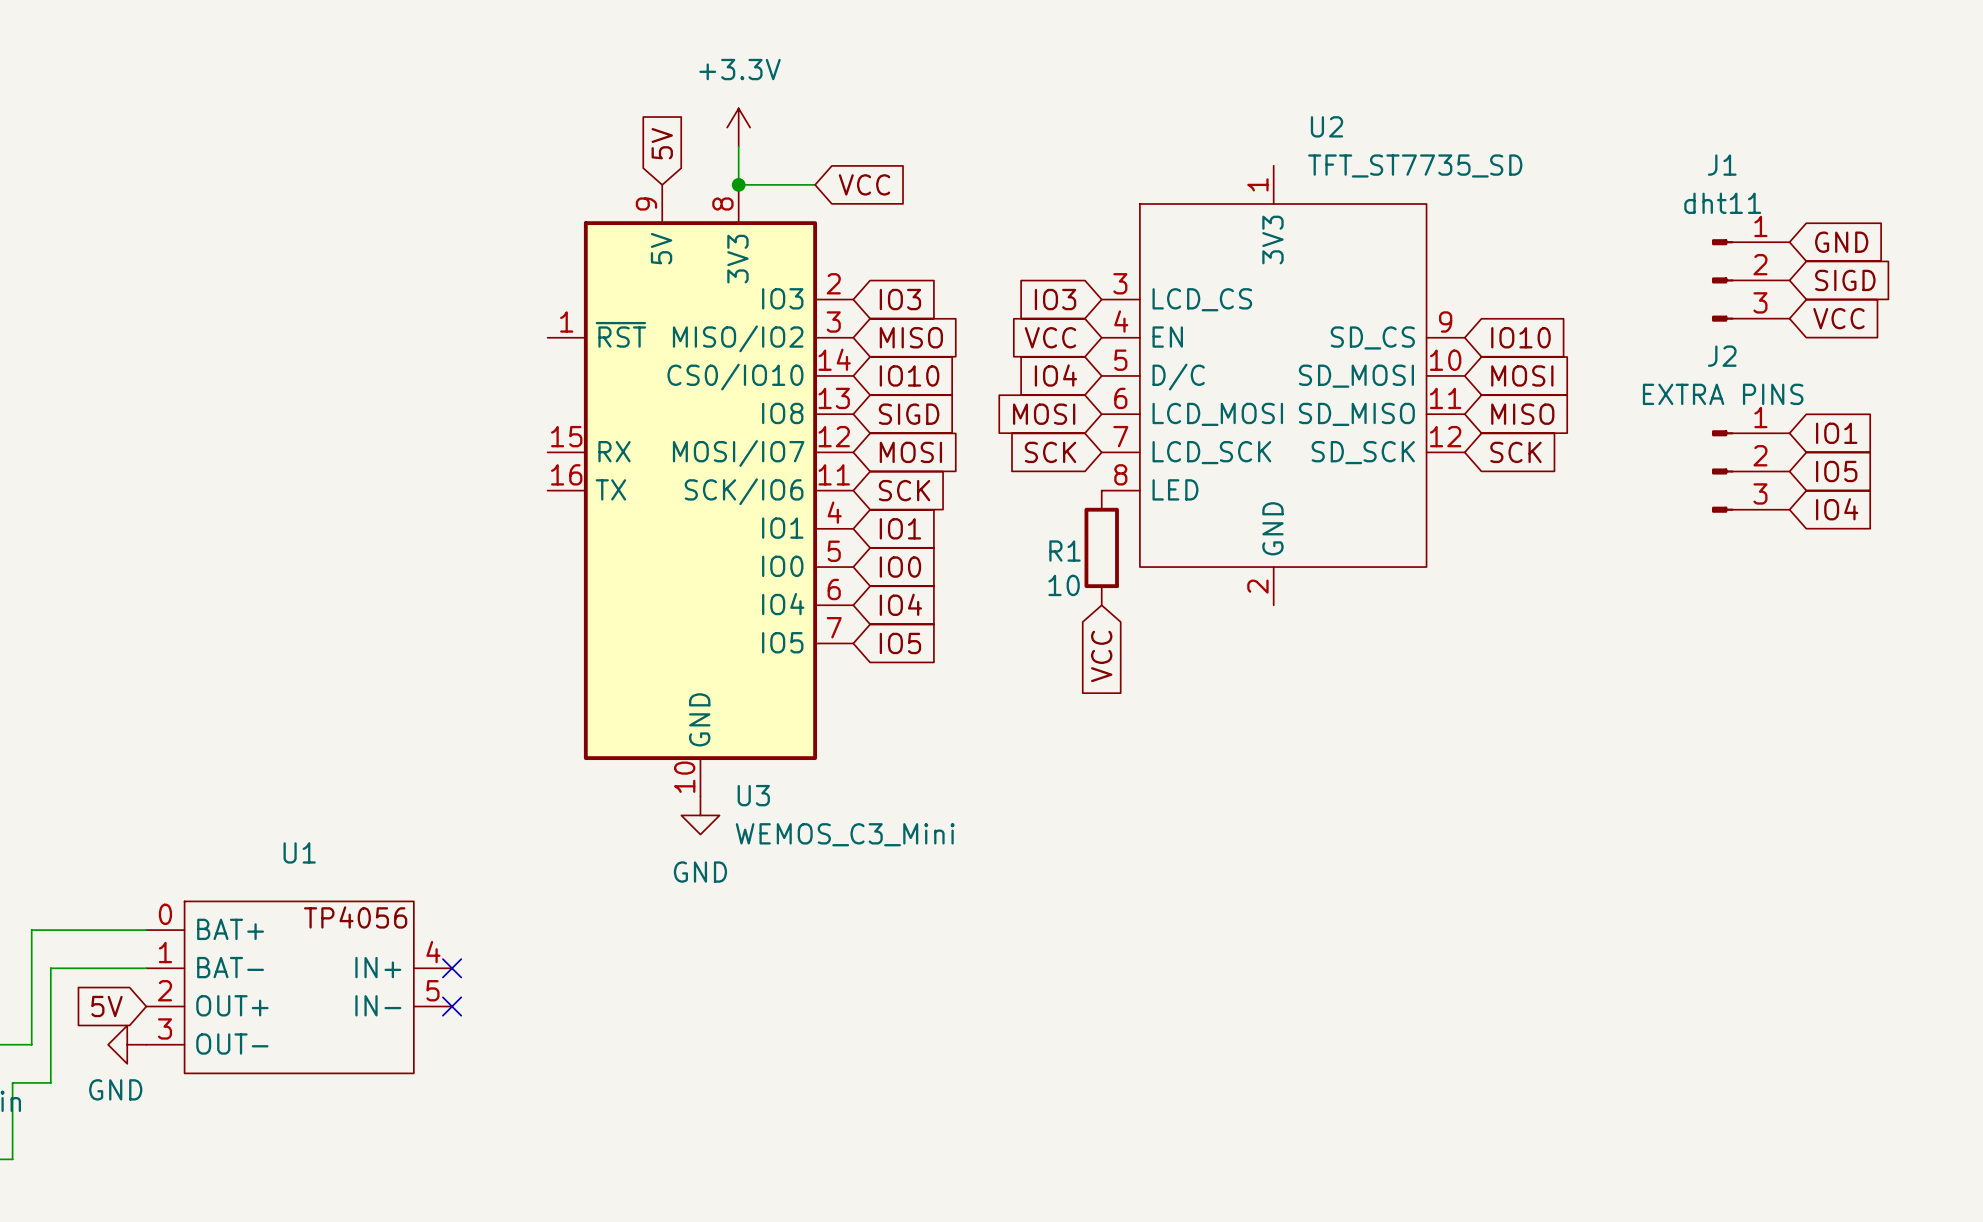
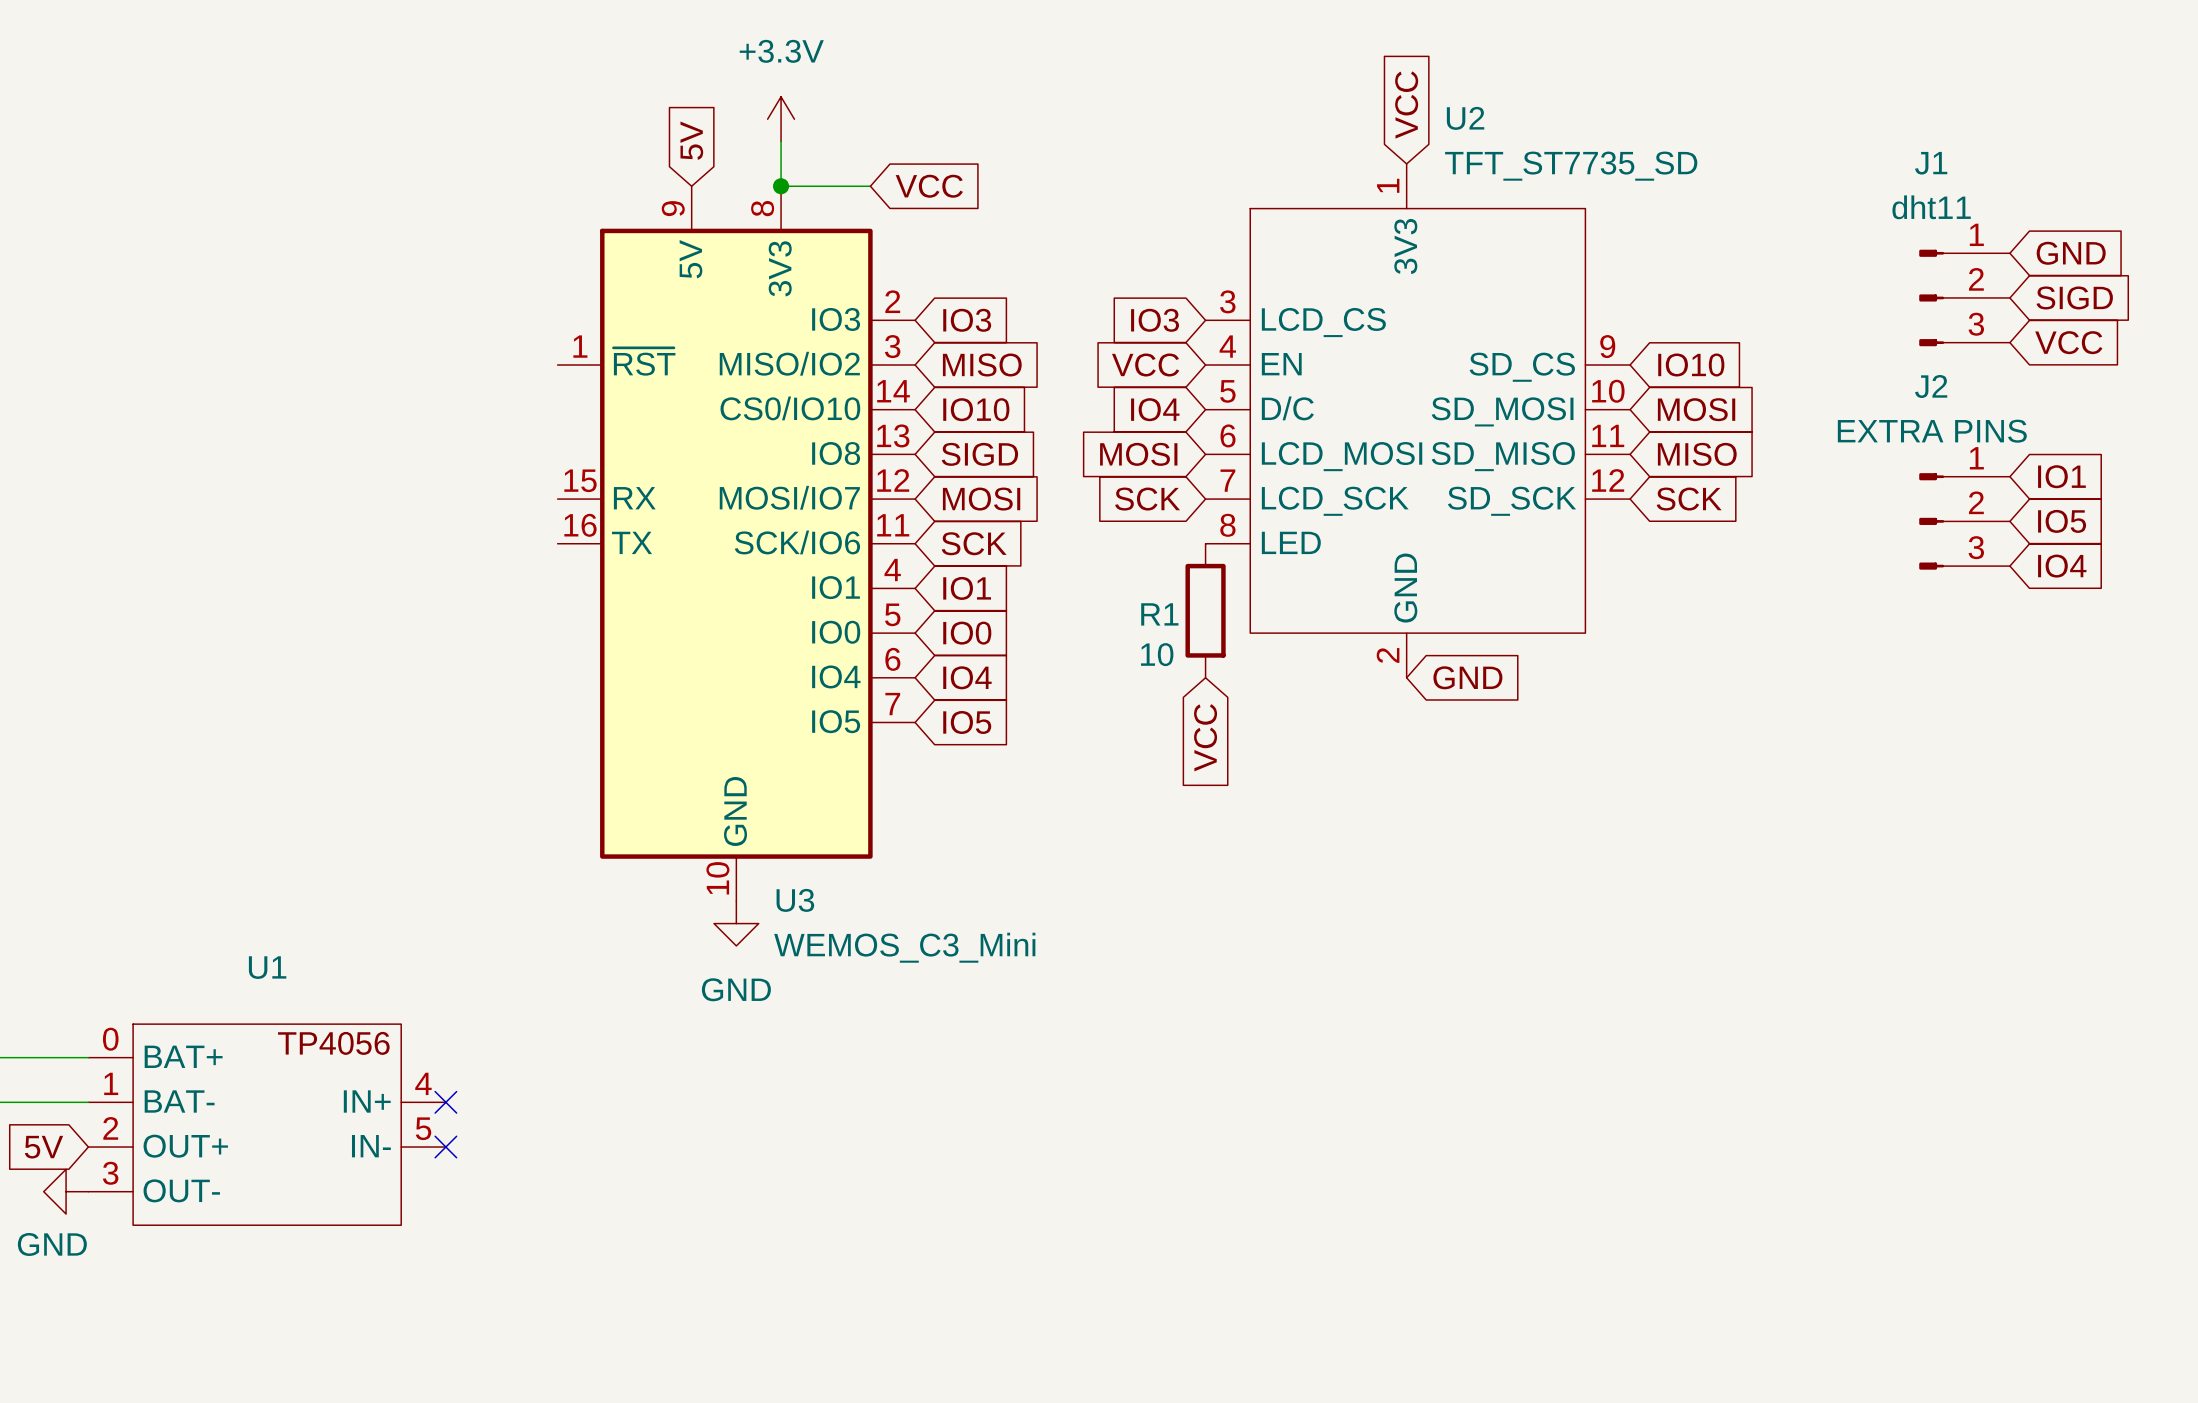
global label: none -> VCC (1406, 105)
global label: none -> GND (1467, 677)

